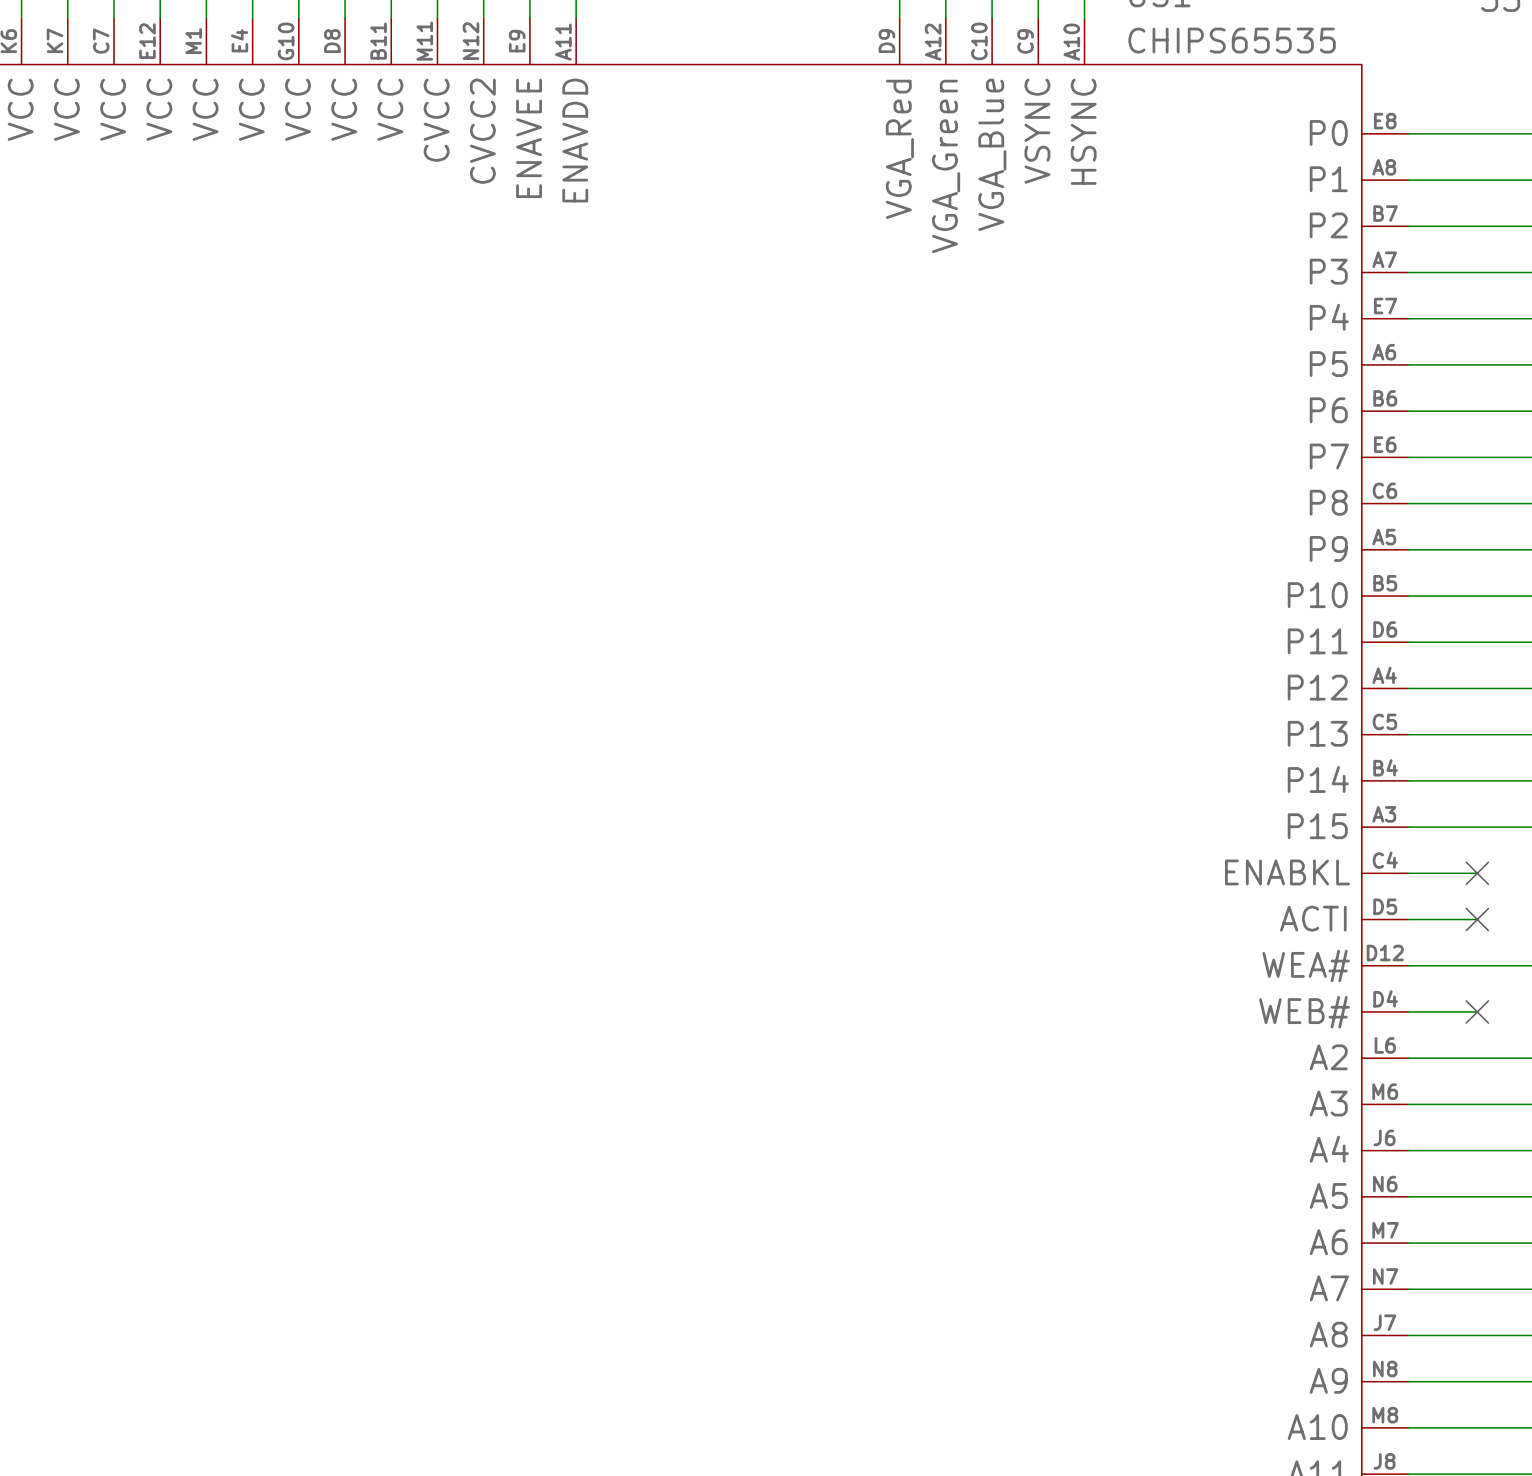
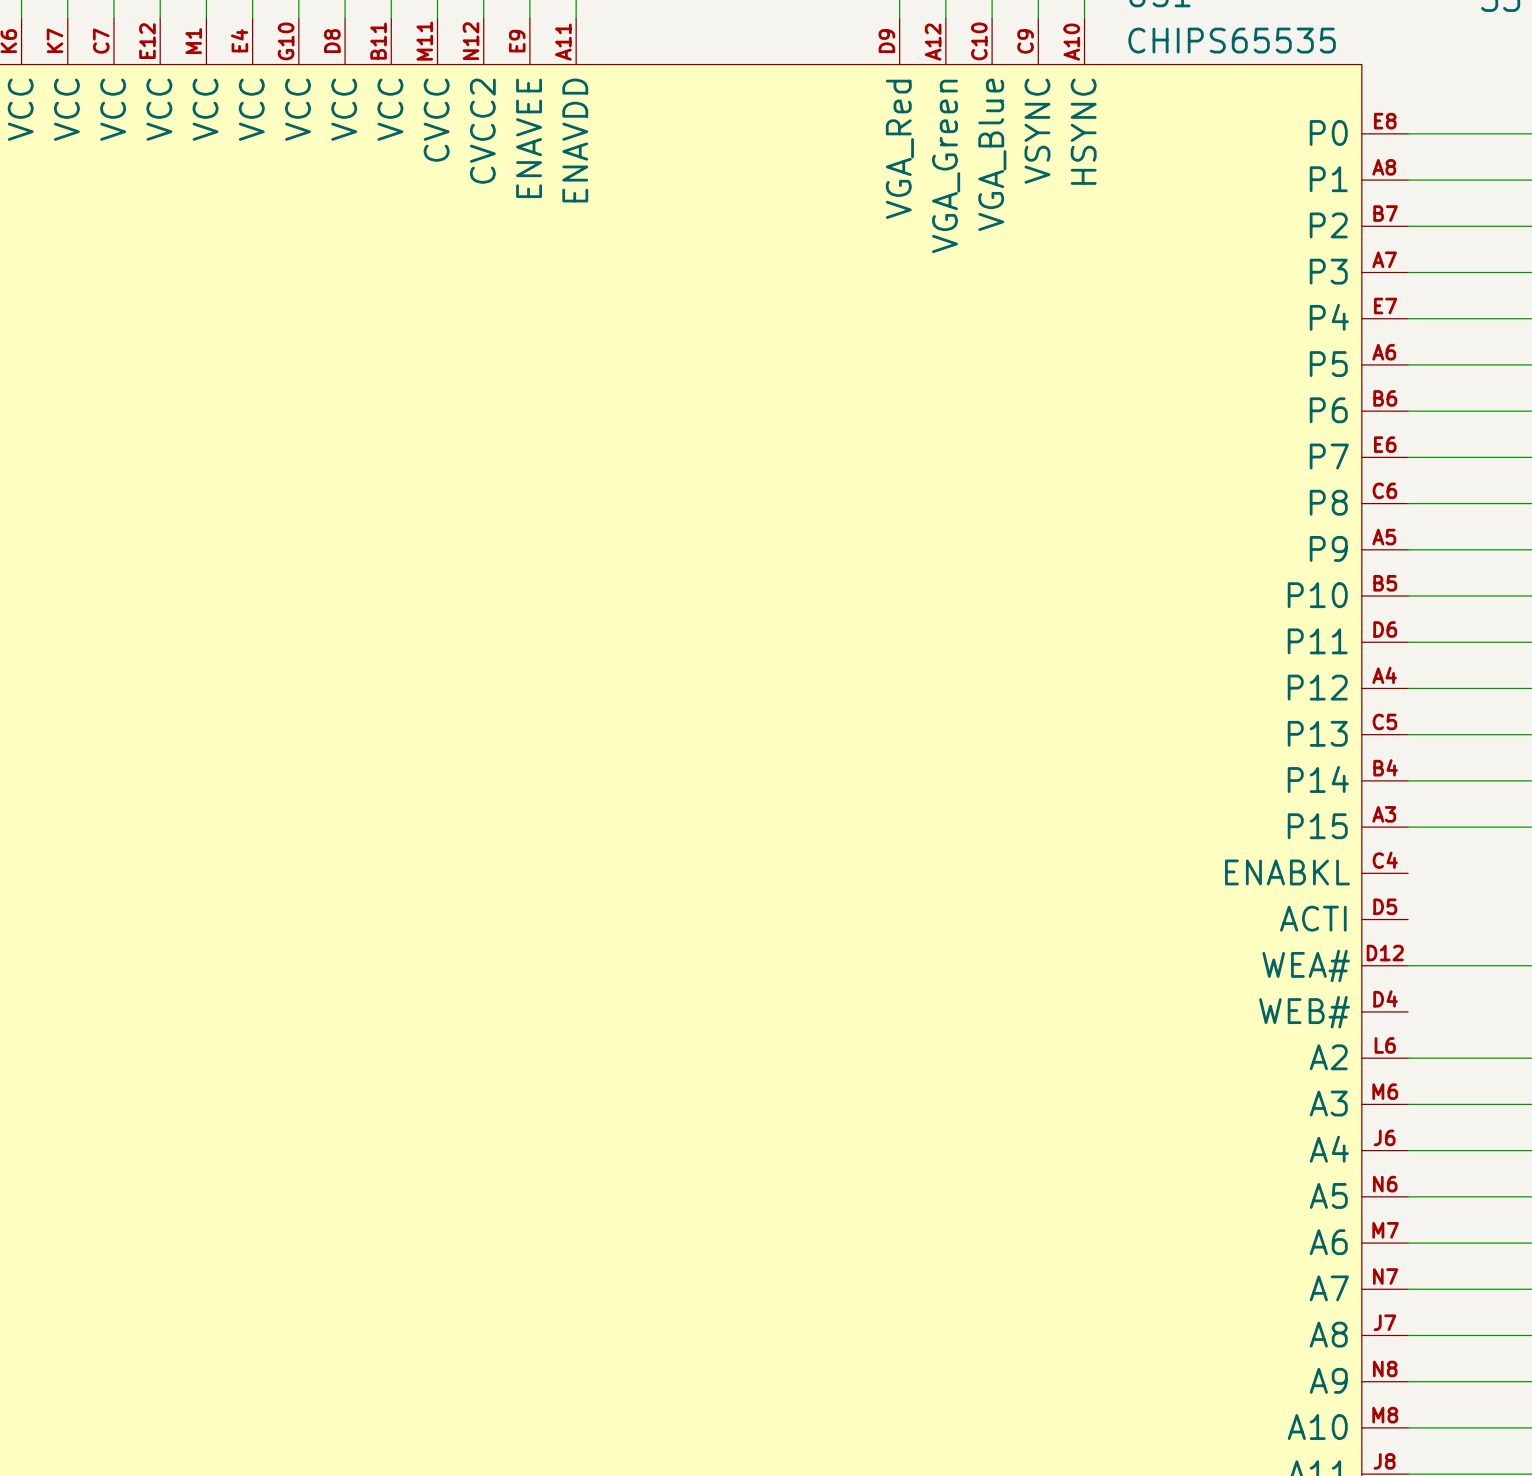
wire: (1408, 873) (1477, 873) -> none
no-connect mark: (1477, 873) -> none
wire: (1408, 919) (1477, 919) -> none
no-connect mark: (1477, 919) -> none
wire: (1408, 1011) (1477, 1011) -> none
no-connect mark: (1477, 1011) -> none

